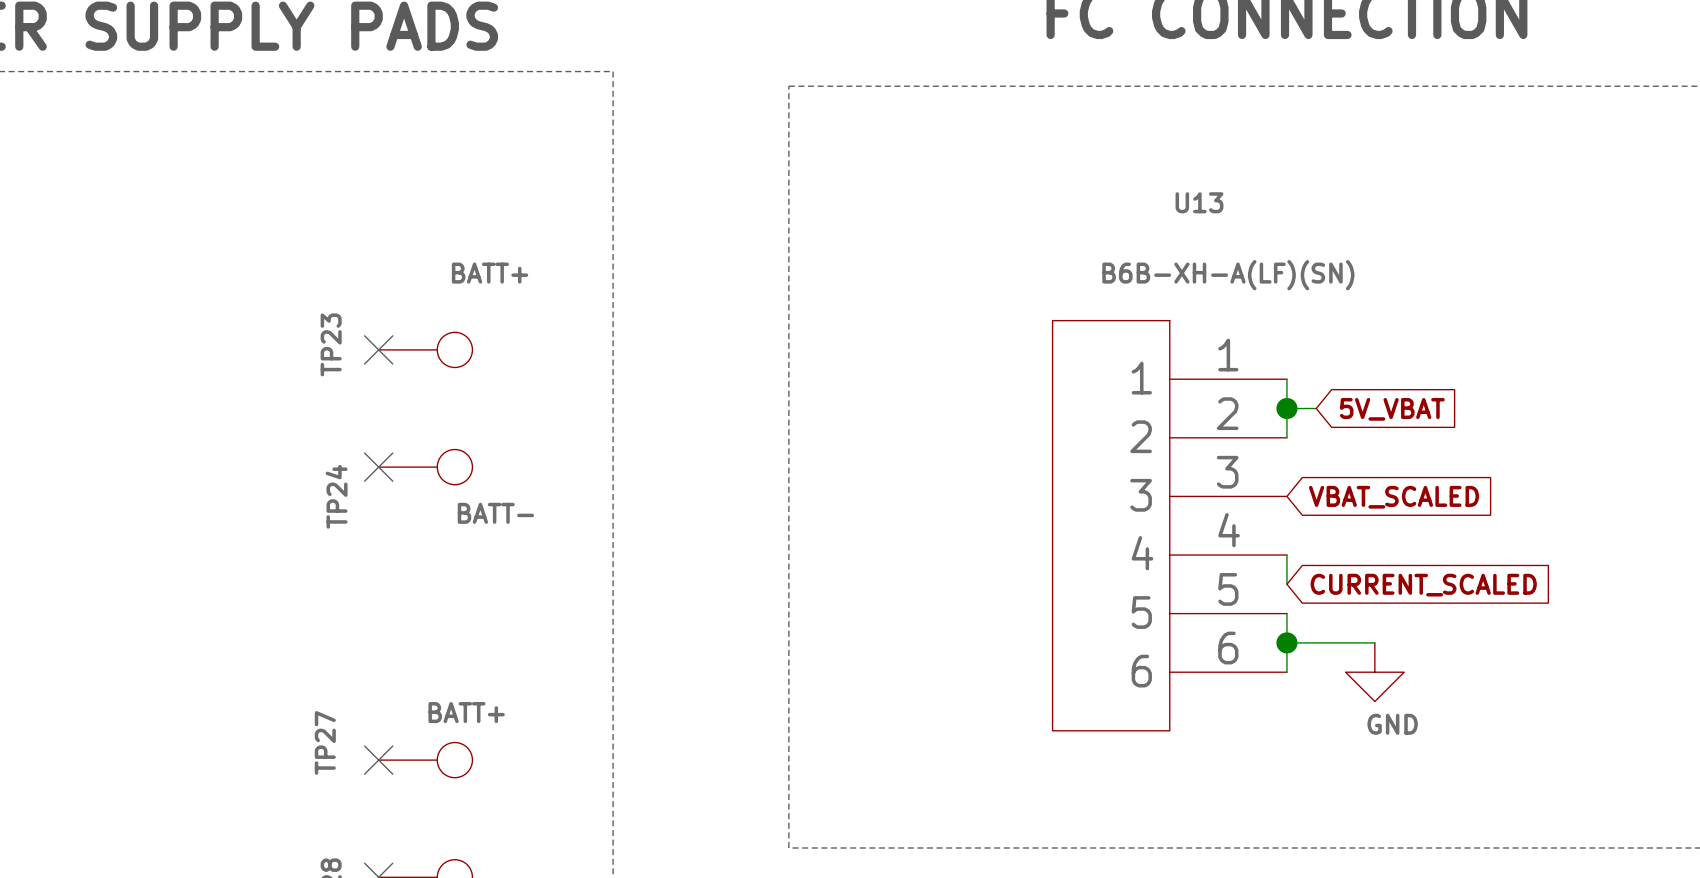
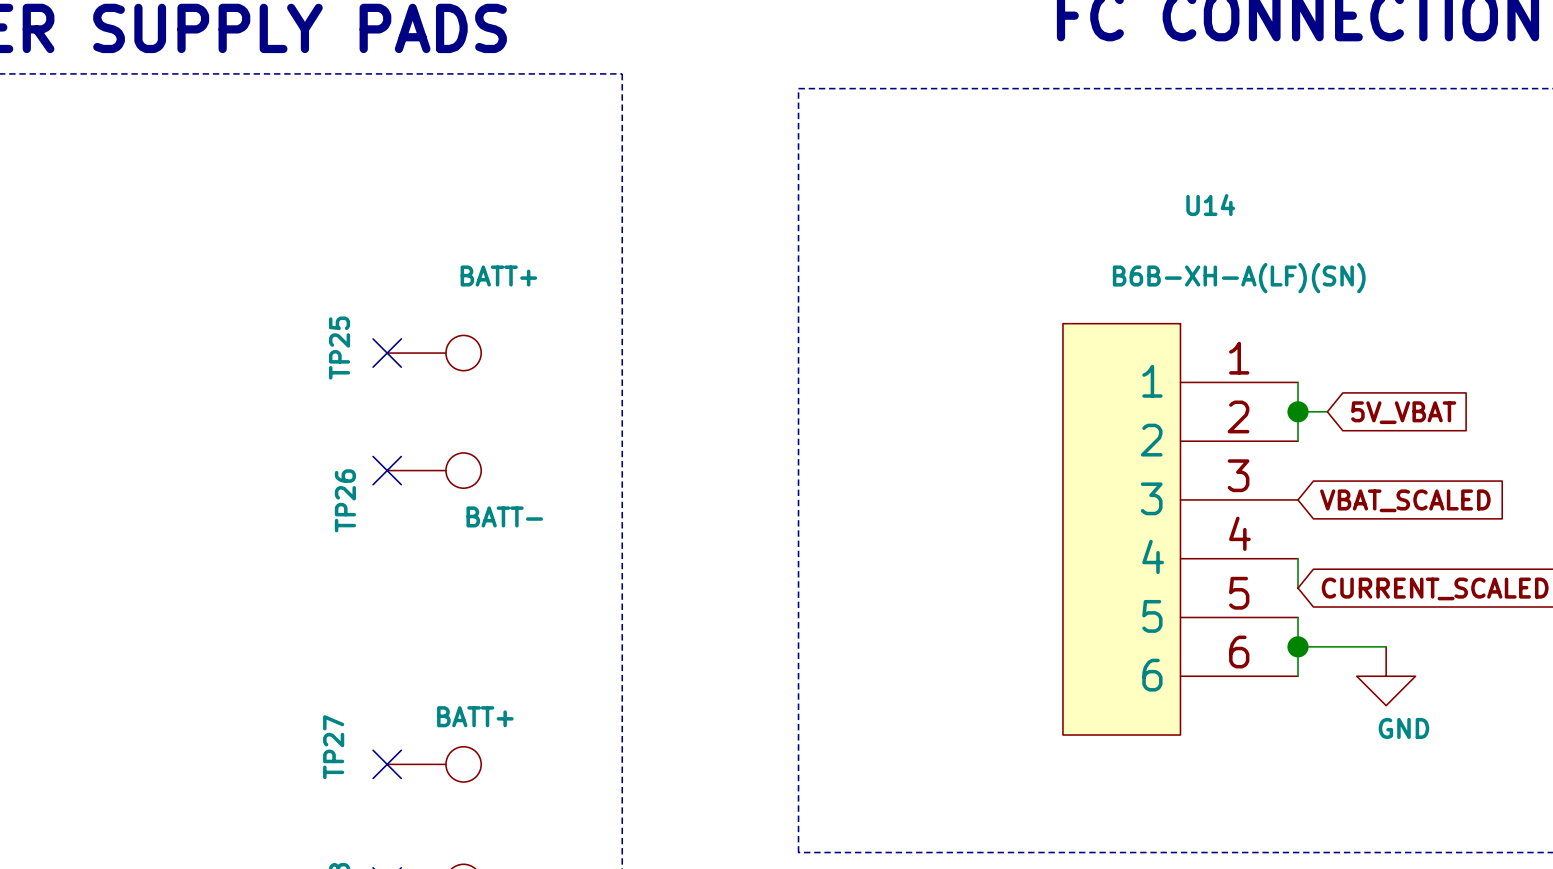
U13 name: U13 (1199, 202) -> U14 (1210, 205)
TP23 name: TP23 (331, 344) -> TP25 (339, 348)
TP24 name: TP24 (336, 496) -> TP26 (345, 500)

